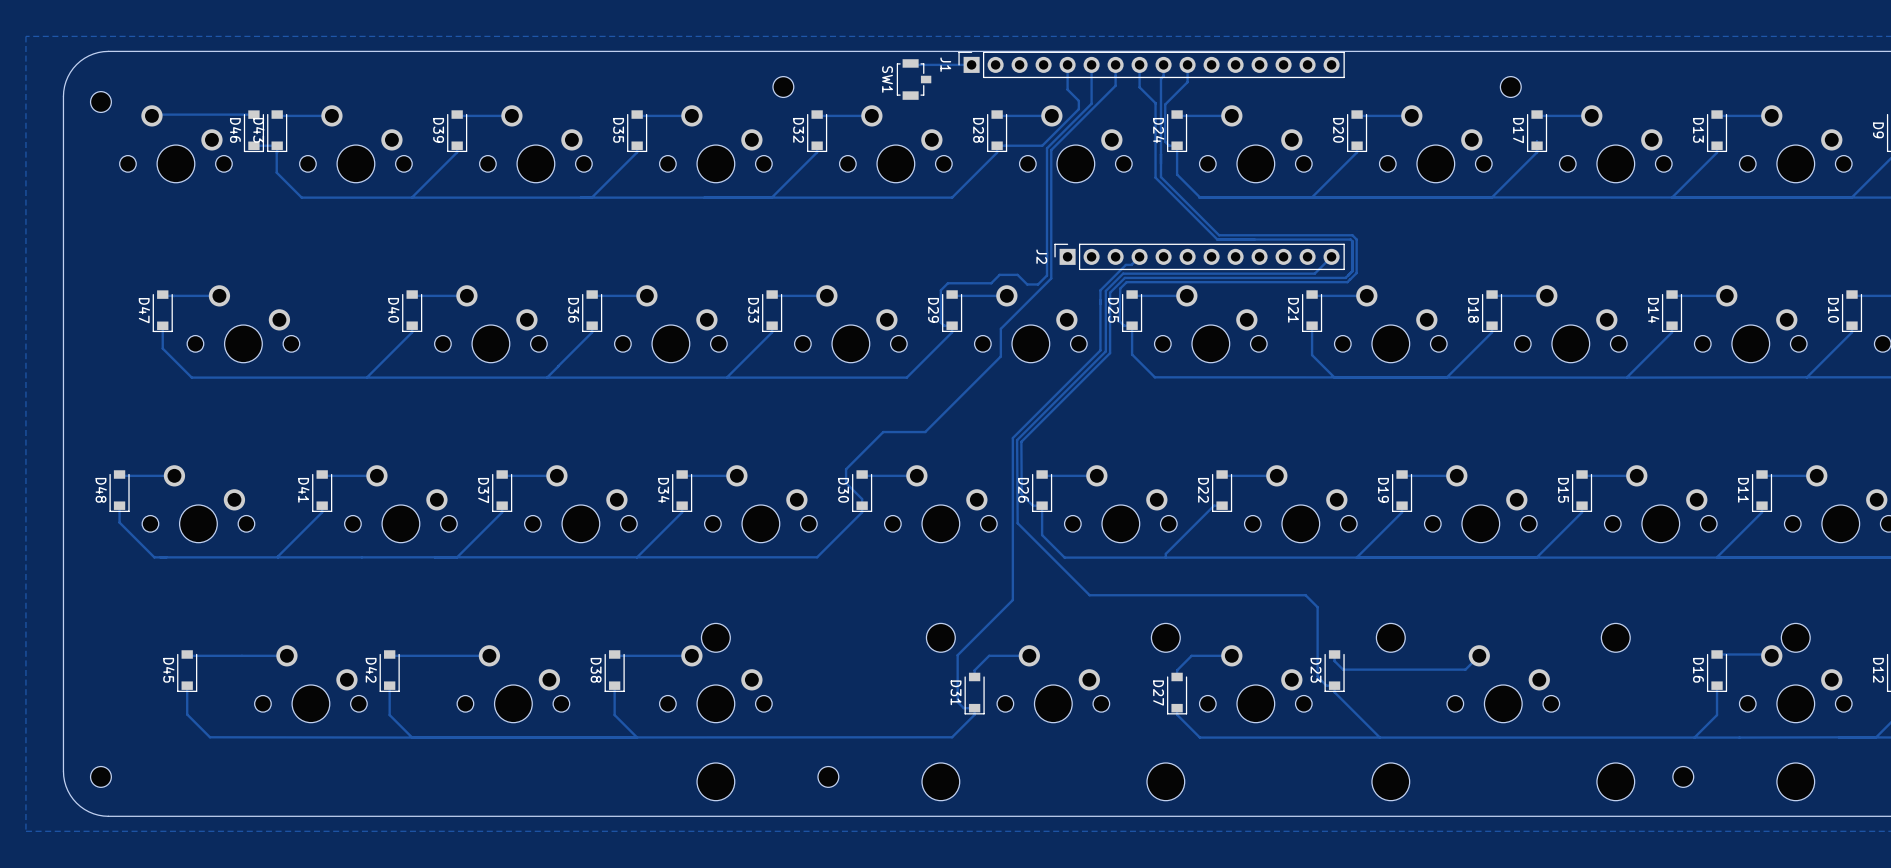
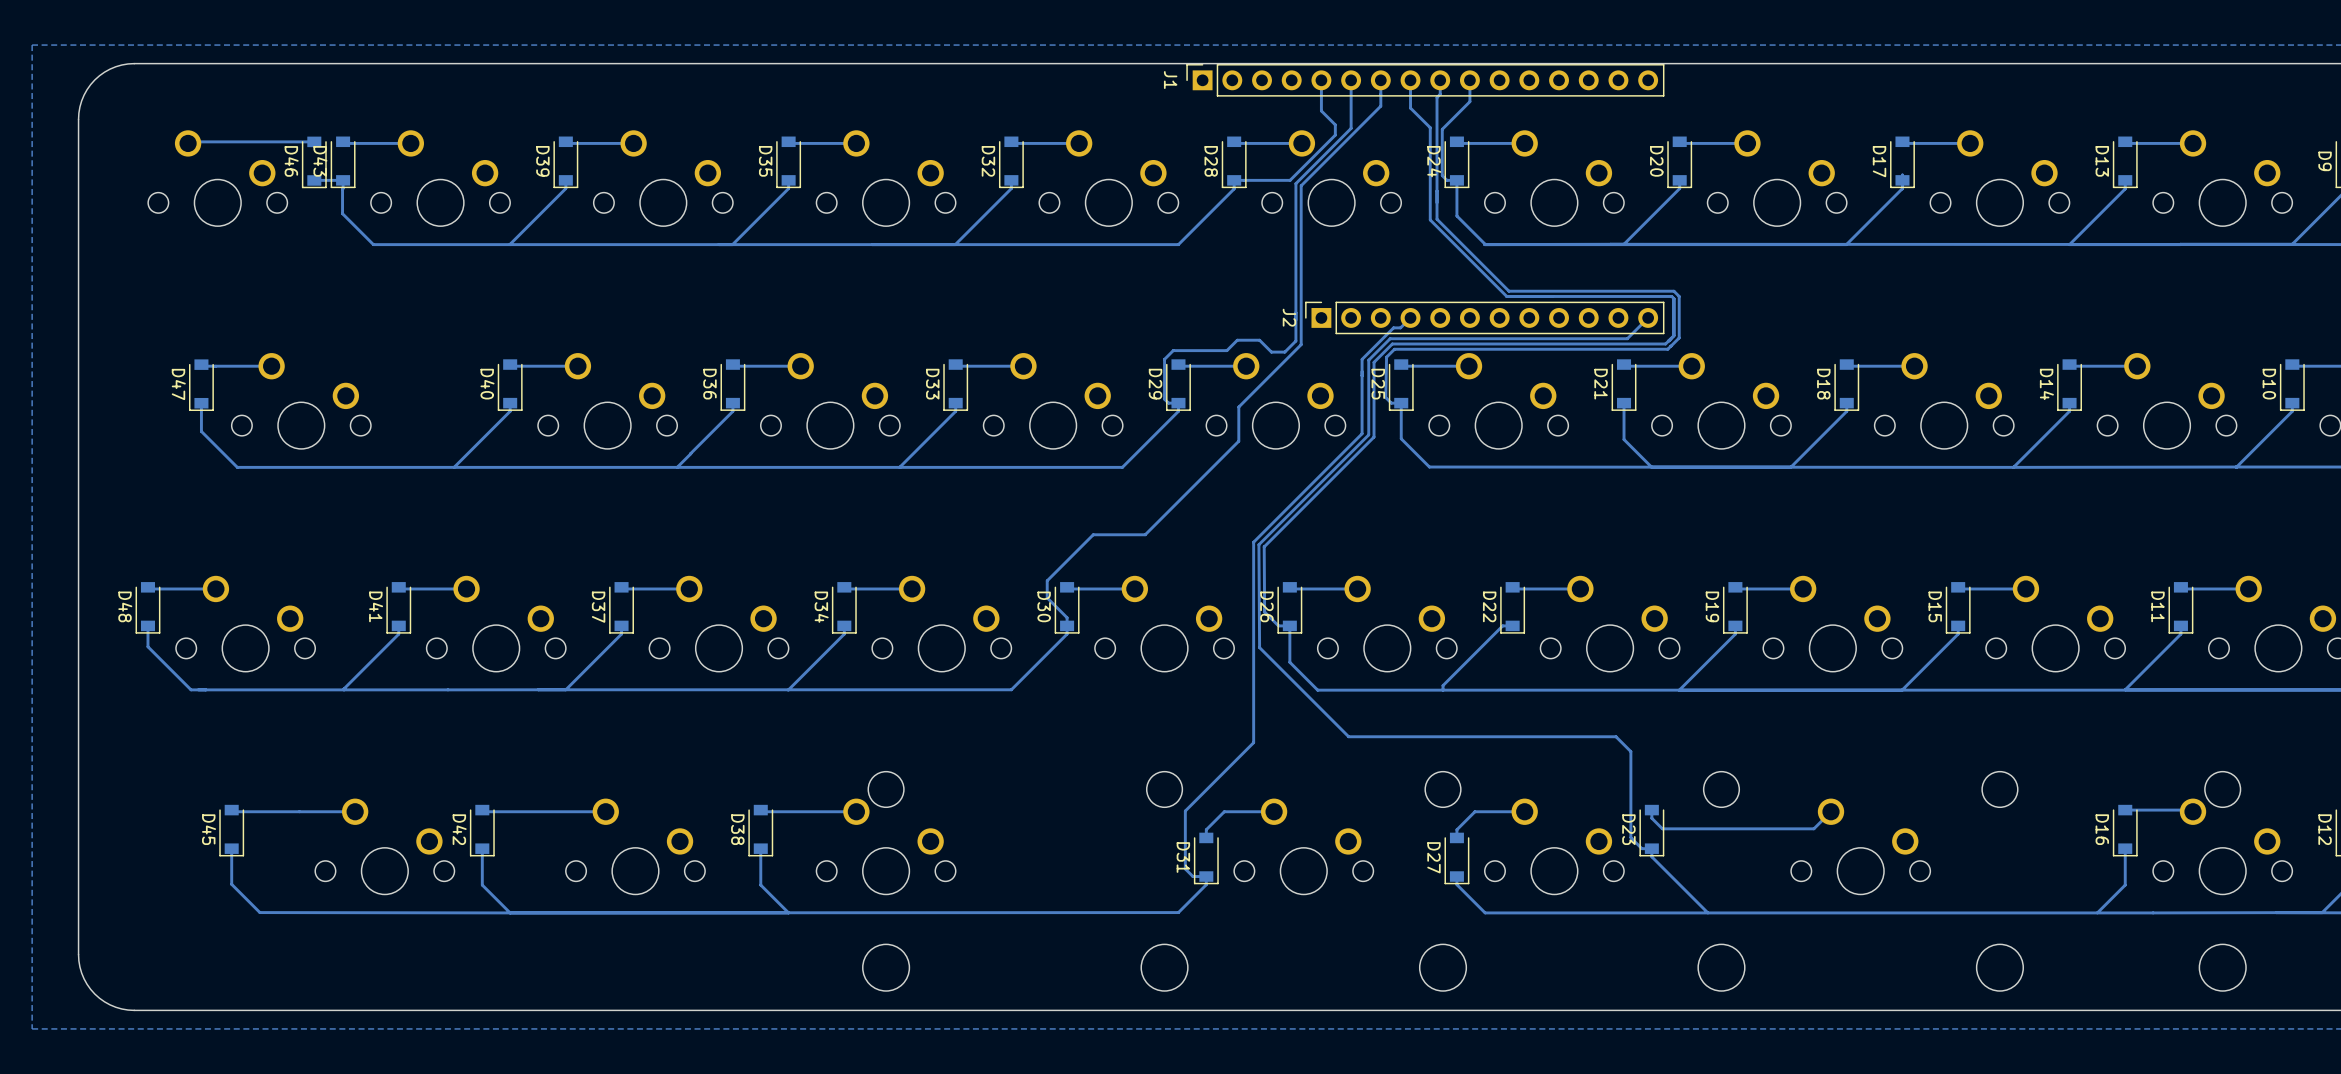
track: (910, 63) (971, 64) -> none
SW1: (914, 79) -> none
part: (783, 87) -> none
part: (1510, 87) -> none
part: (100, 102) -> none
part: (100, 776) -> none
part: (828, 776) -> none
part: (1683, 776) -> none

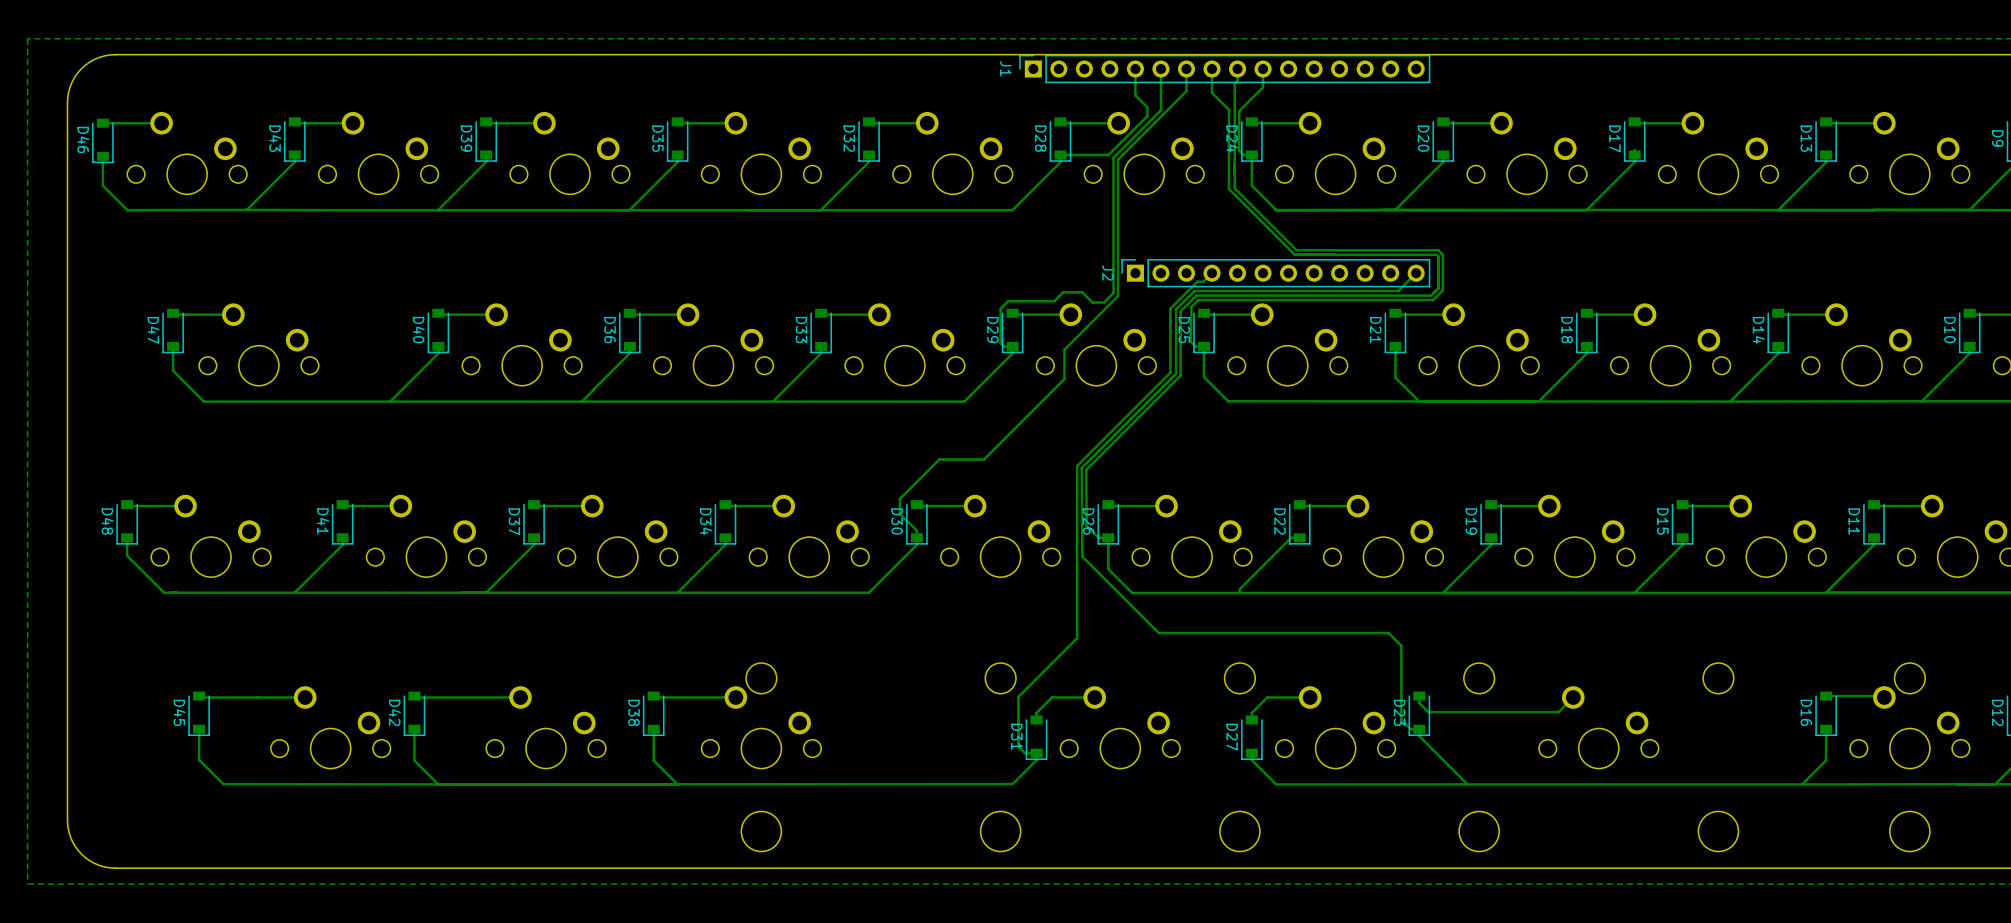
track: (314, 141) (189, 141) -> none
track: none -> (161, 123) (102, 123)
D46 position: (314, 162) -> (102, 140)
track: (343, 180) (314, 180) -> none
track: none -> (102, 156) (102, 185) (127, 210) (245, 209)
track: (342, 189) (342, 213) (373, 244) -> (245, 209) (320, 210)
track: none -> (294, 162) (245, 209)

